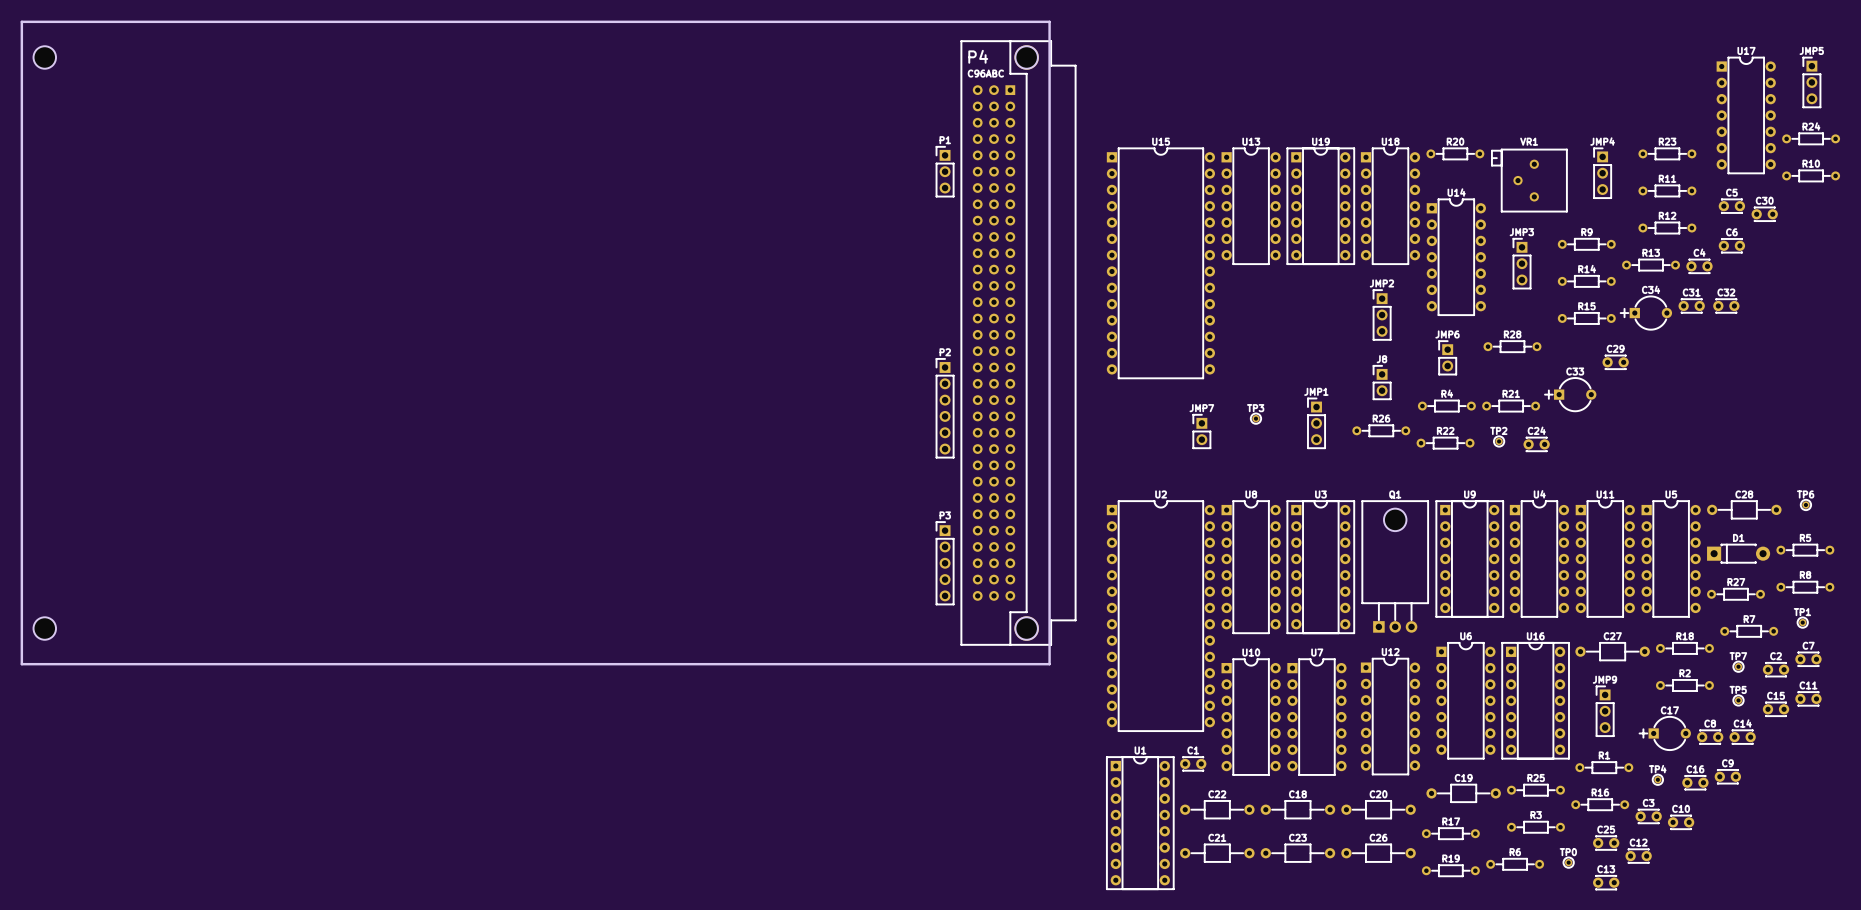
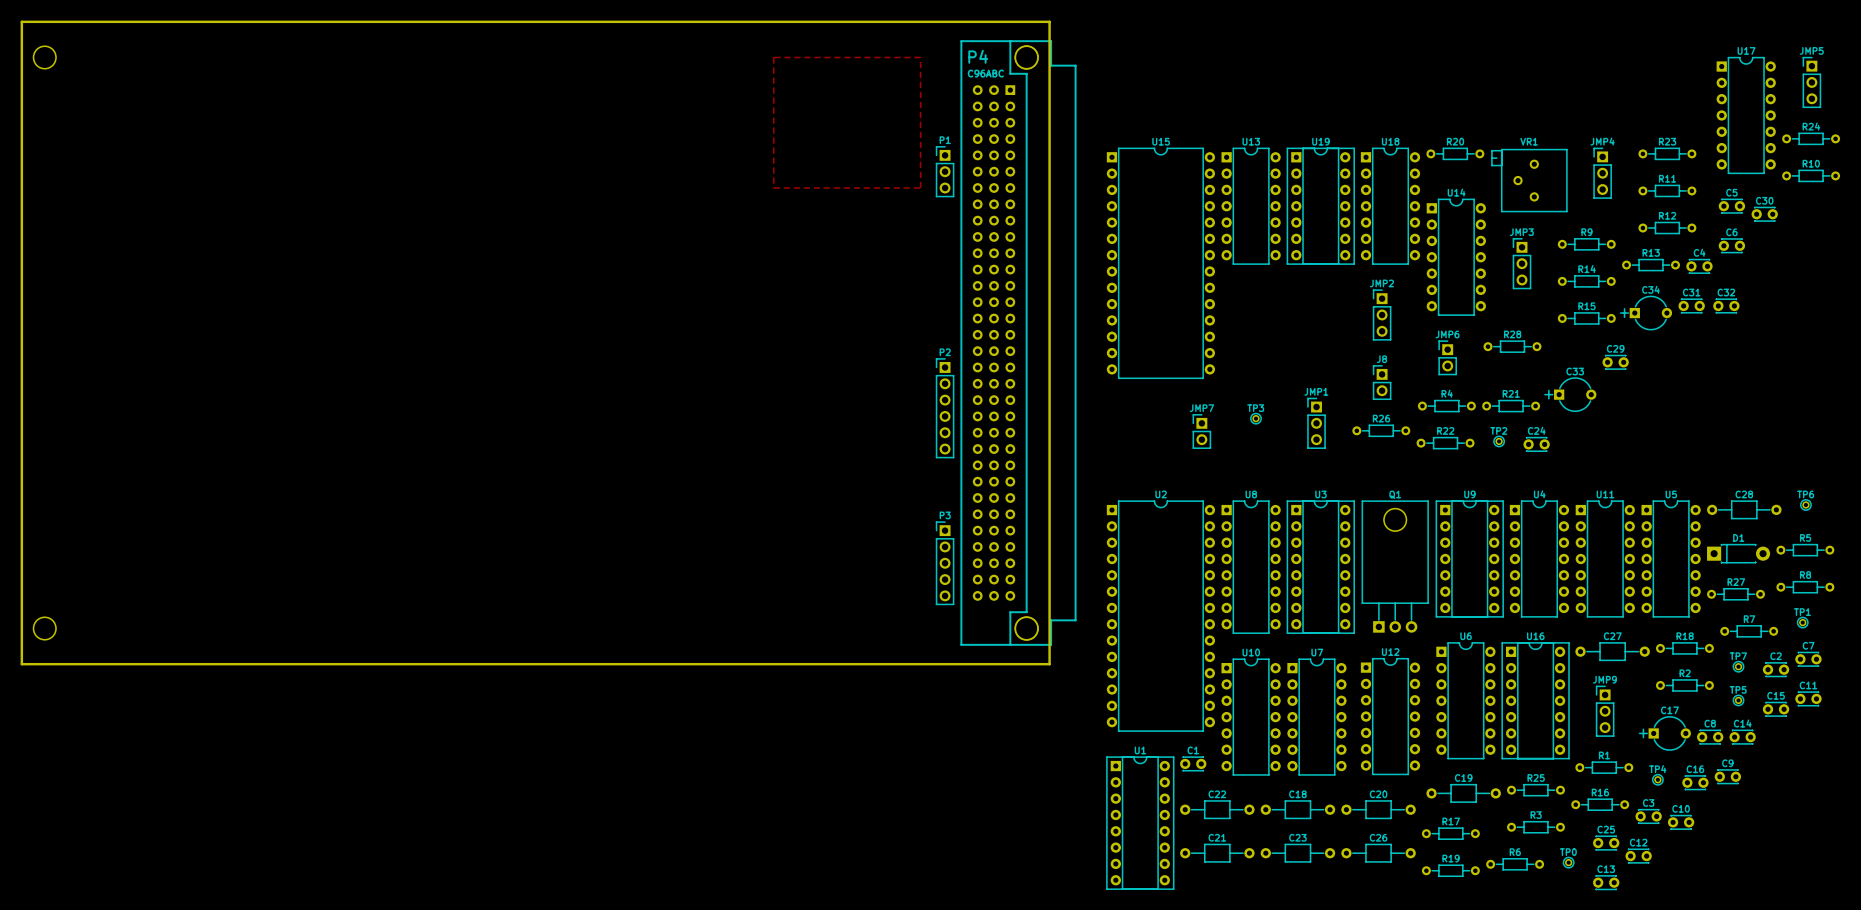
zone outline: none -> (773, 57) (920, 57) (920, 188) (773, 188) (773, 57)

